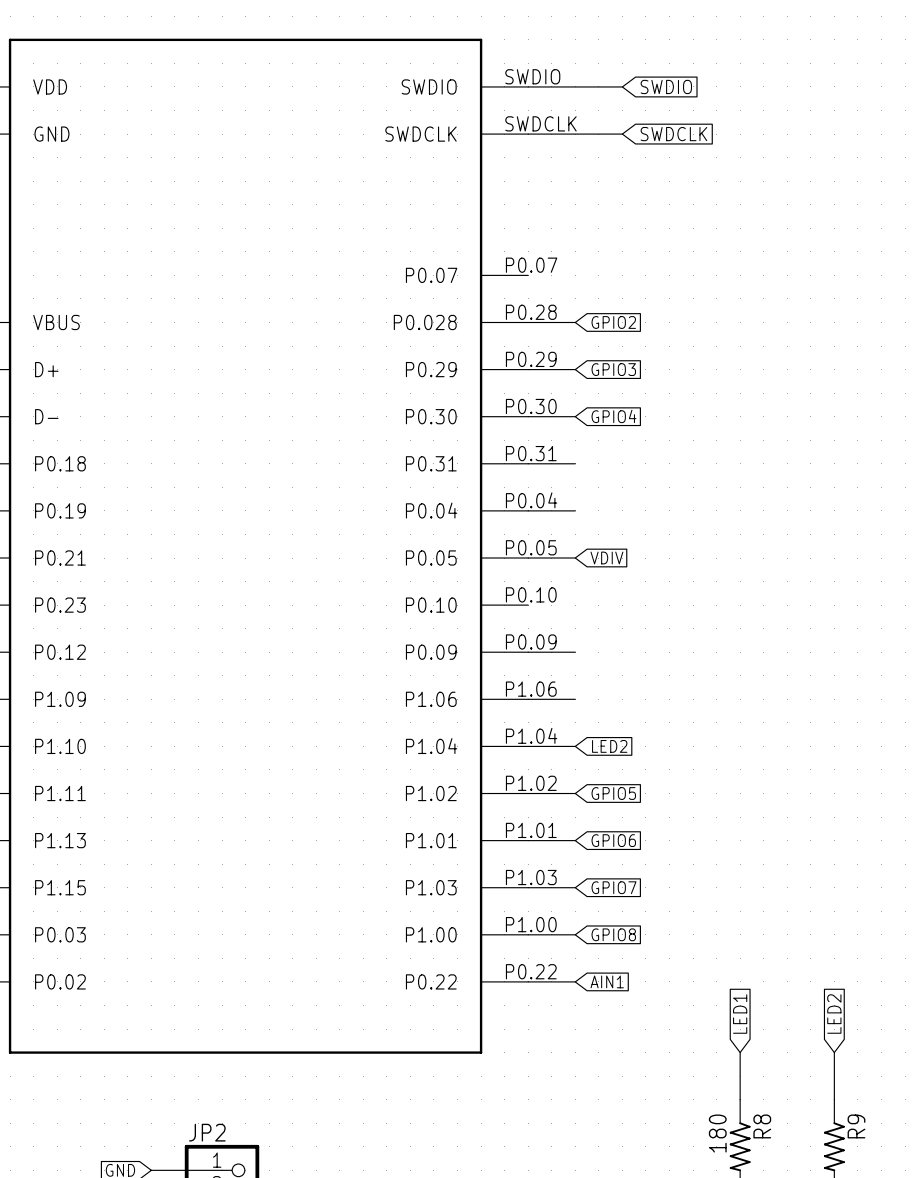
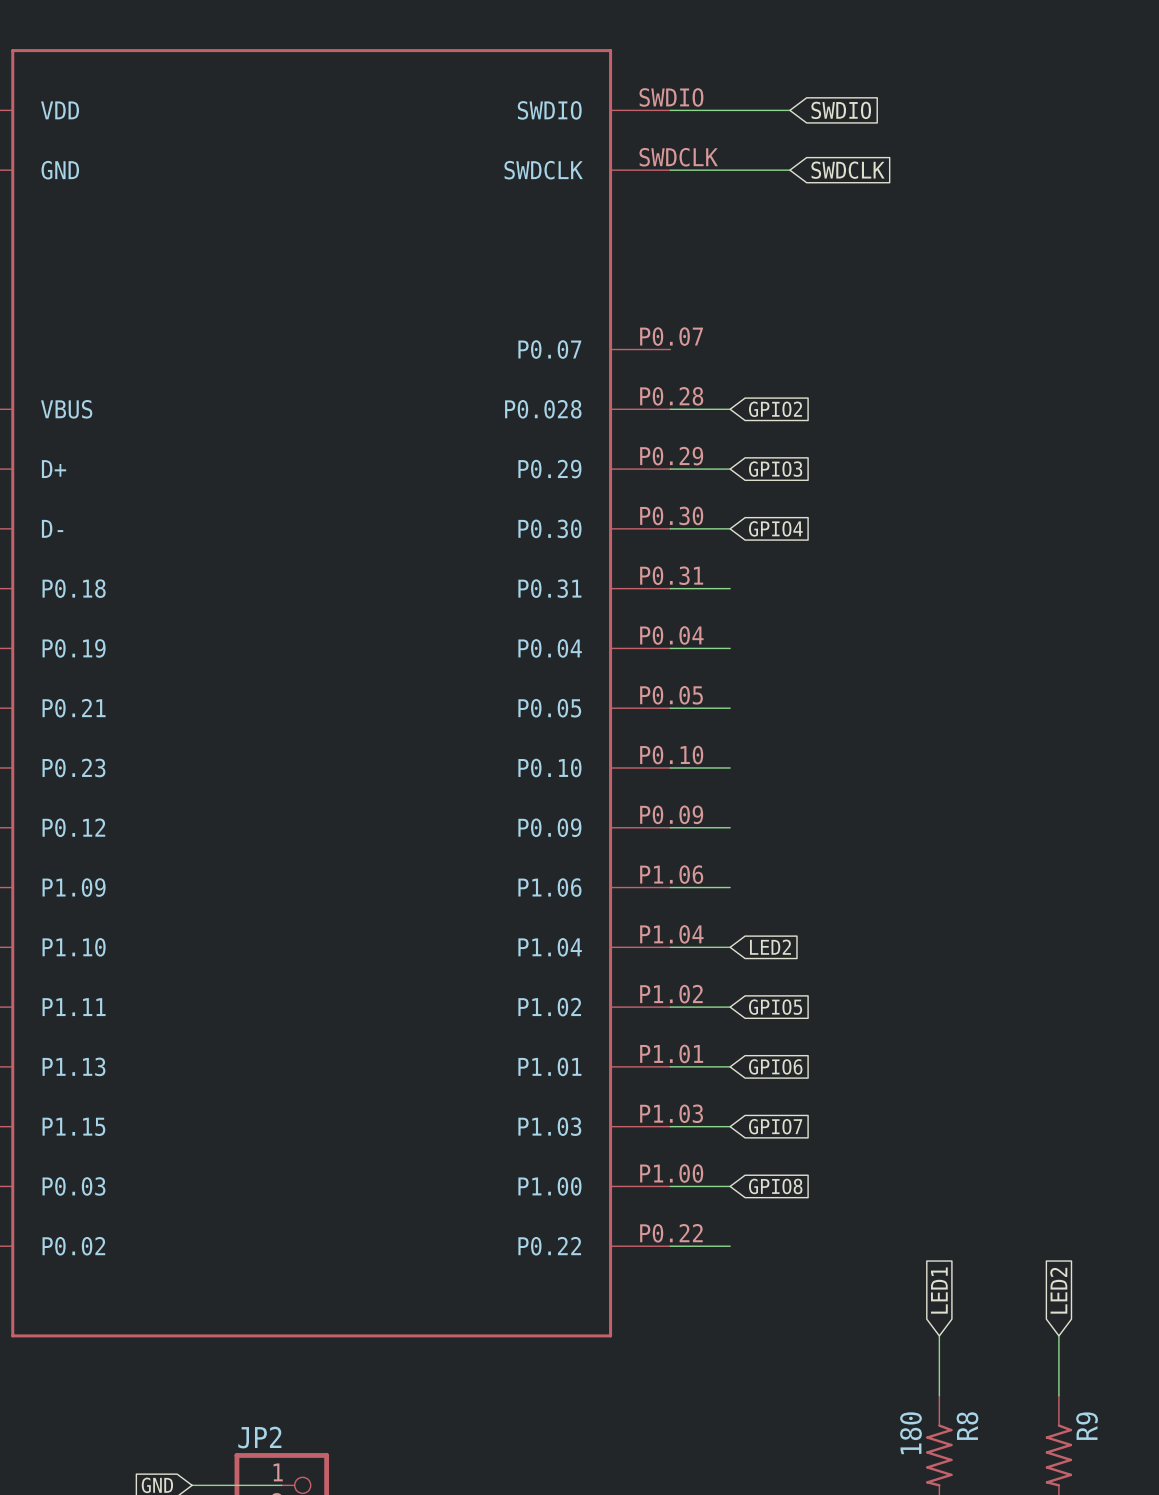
global label: VDIV (606, 558) -> none
wire: none -> (670, 767) (730, 767)
global label: AIN1 (607, 981) -> none

